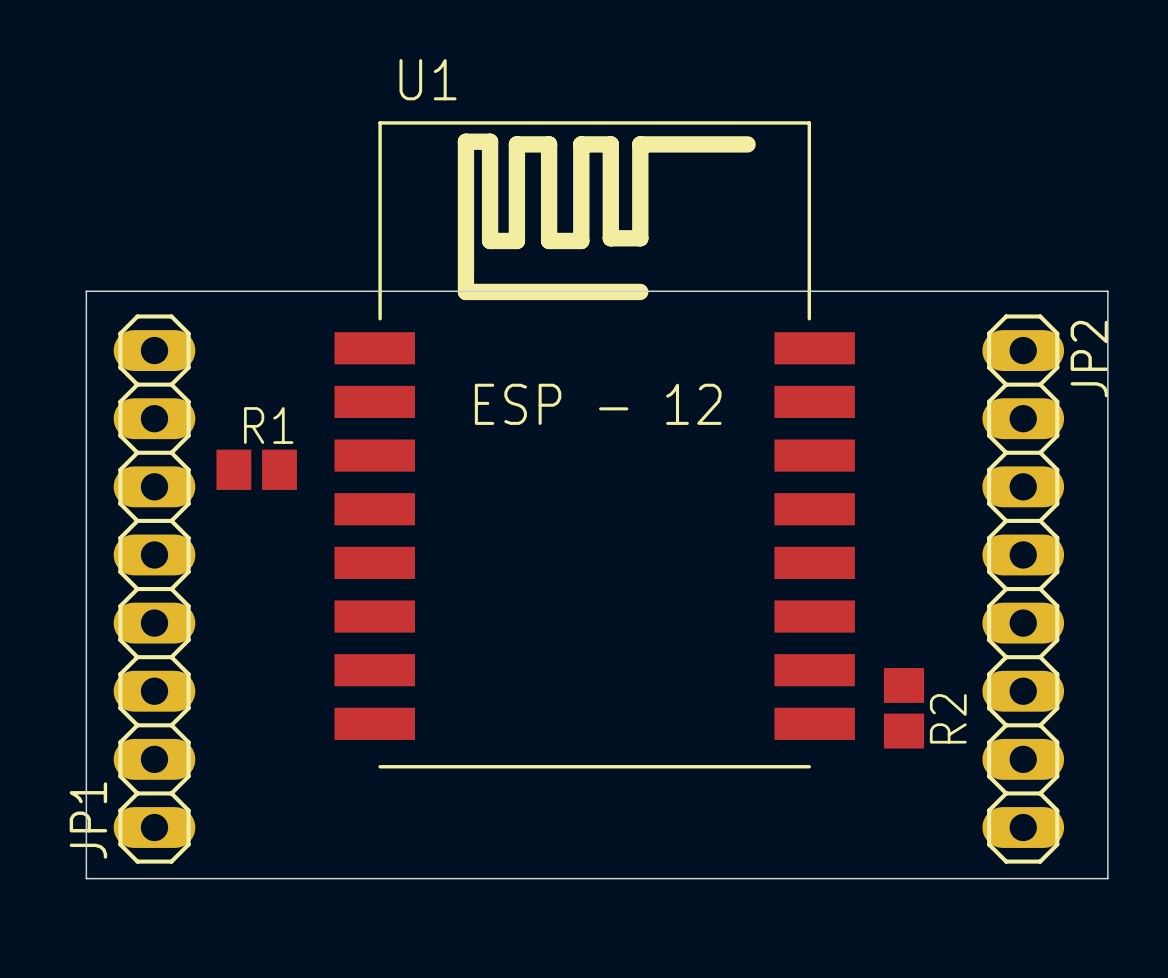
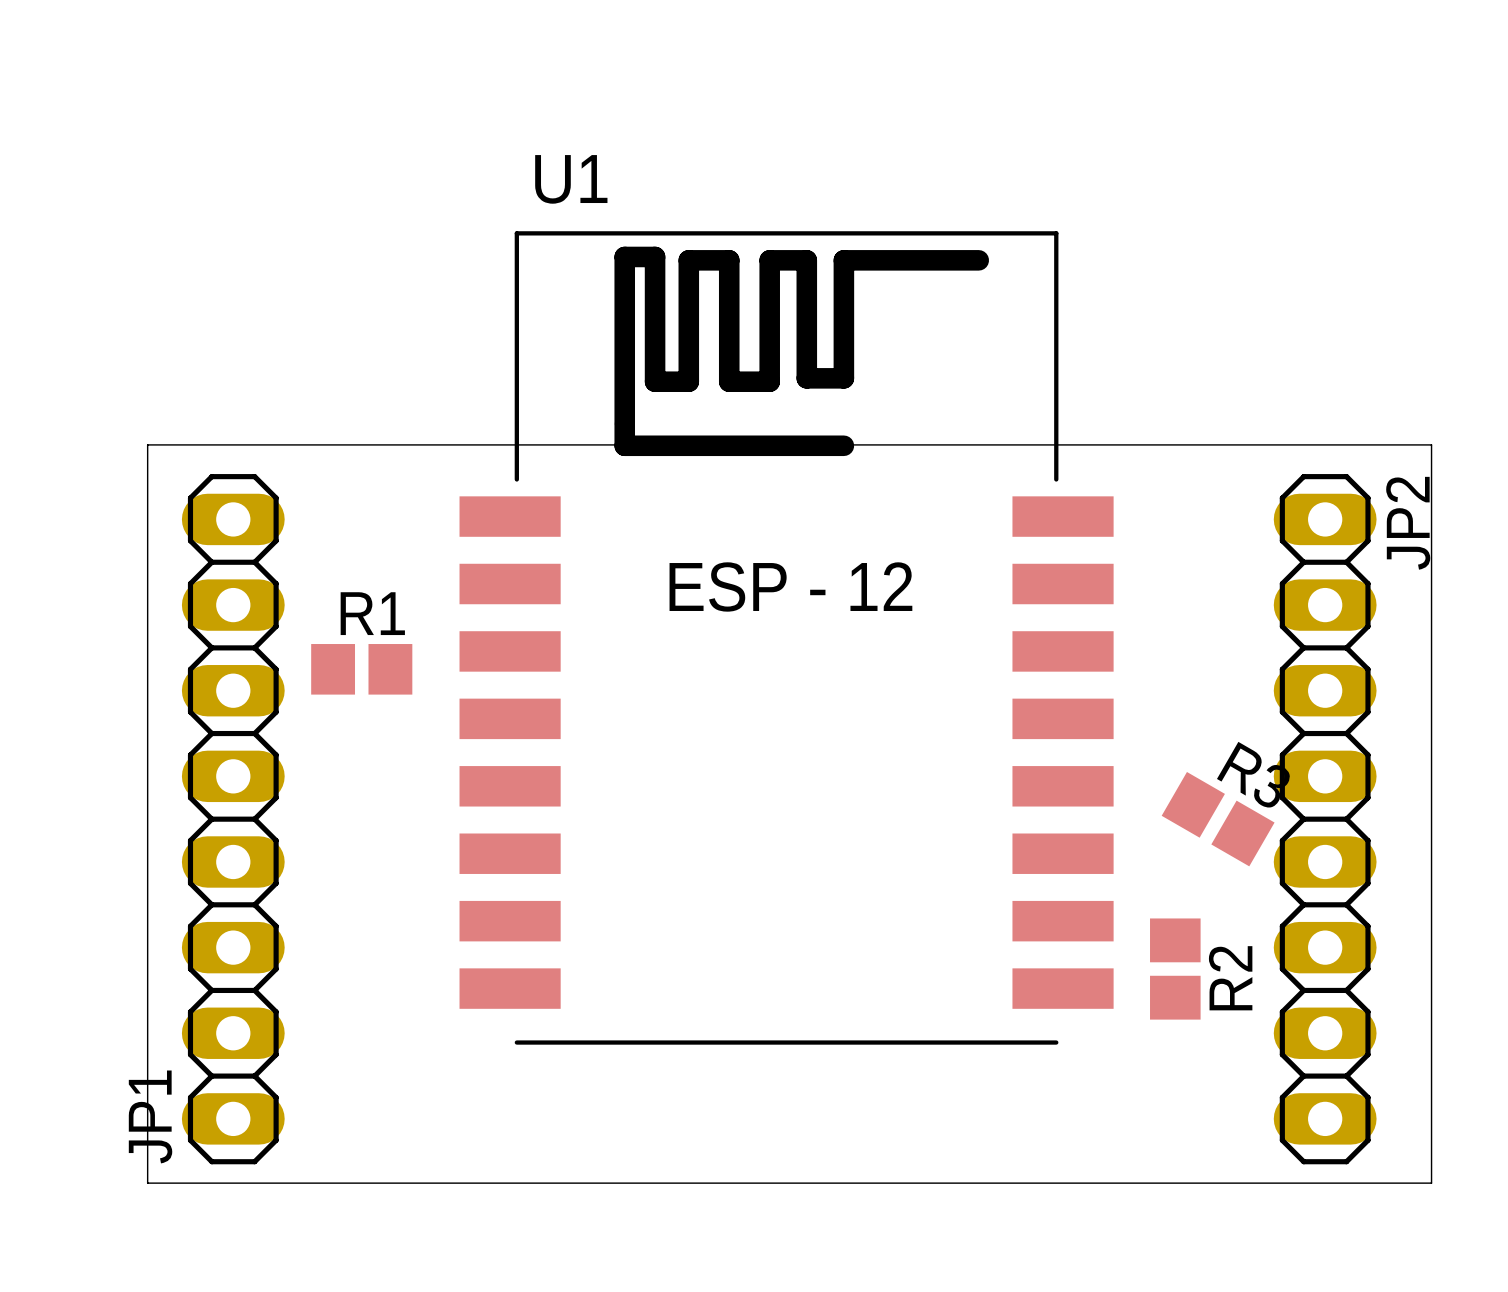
R3: none -> (1218, 819)

